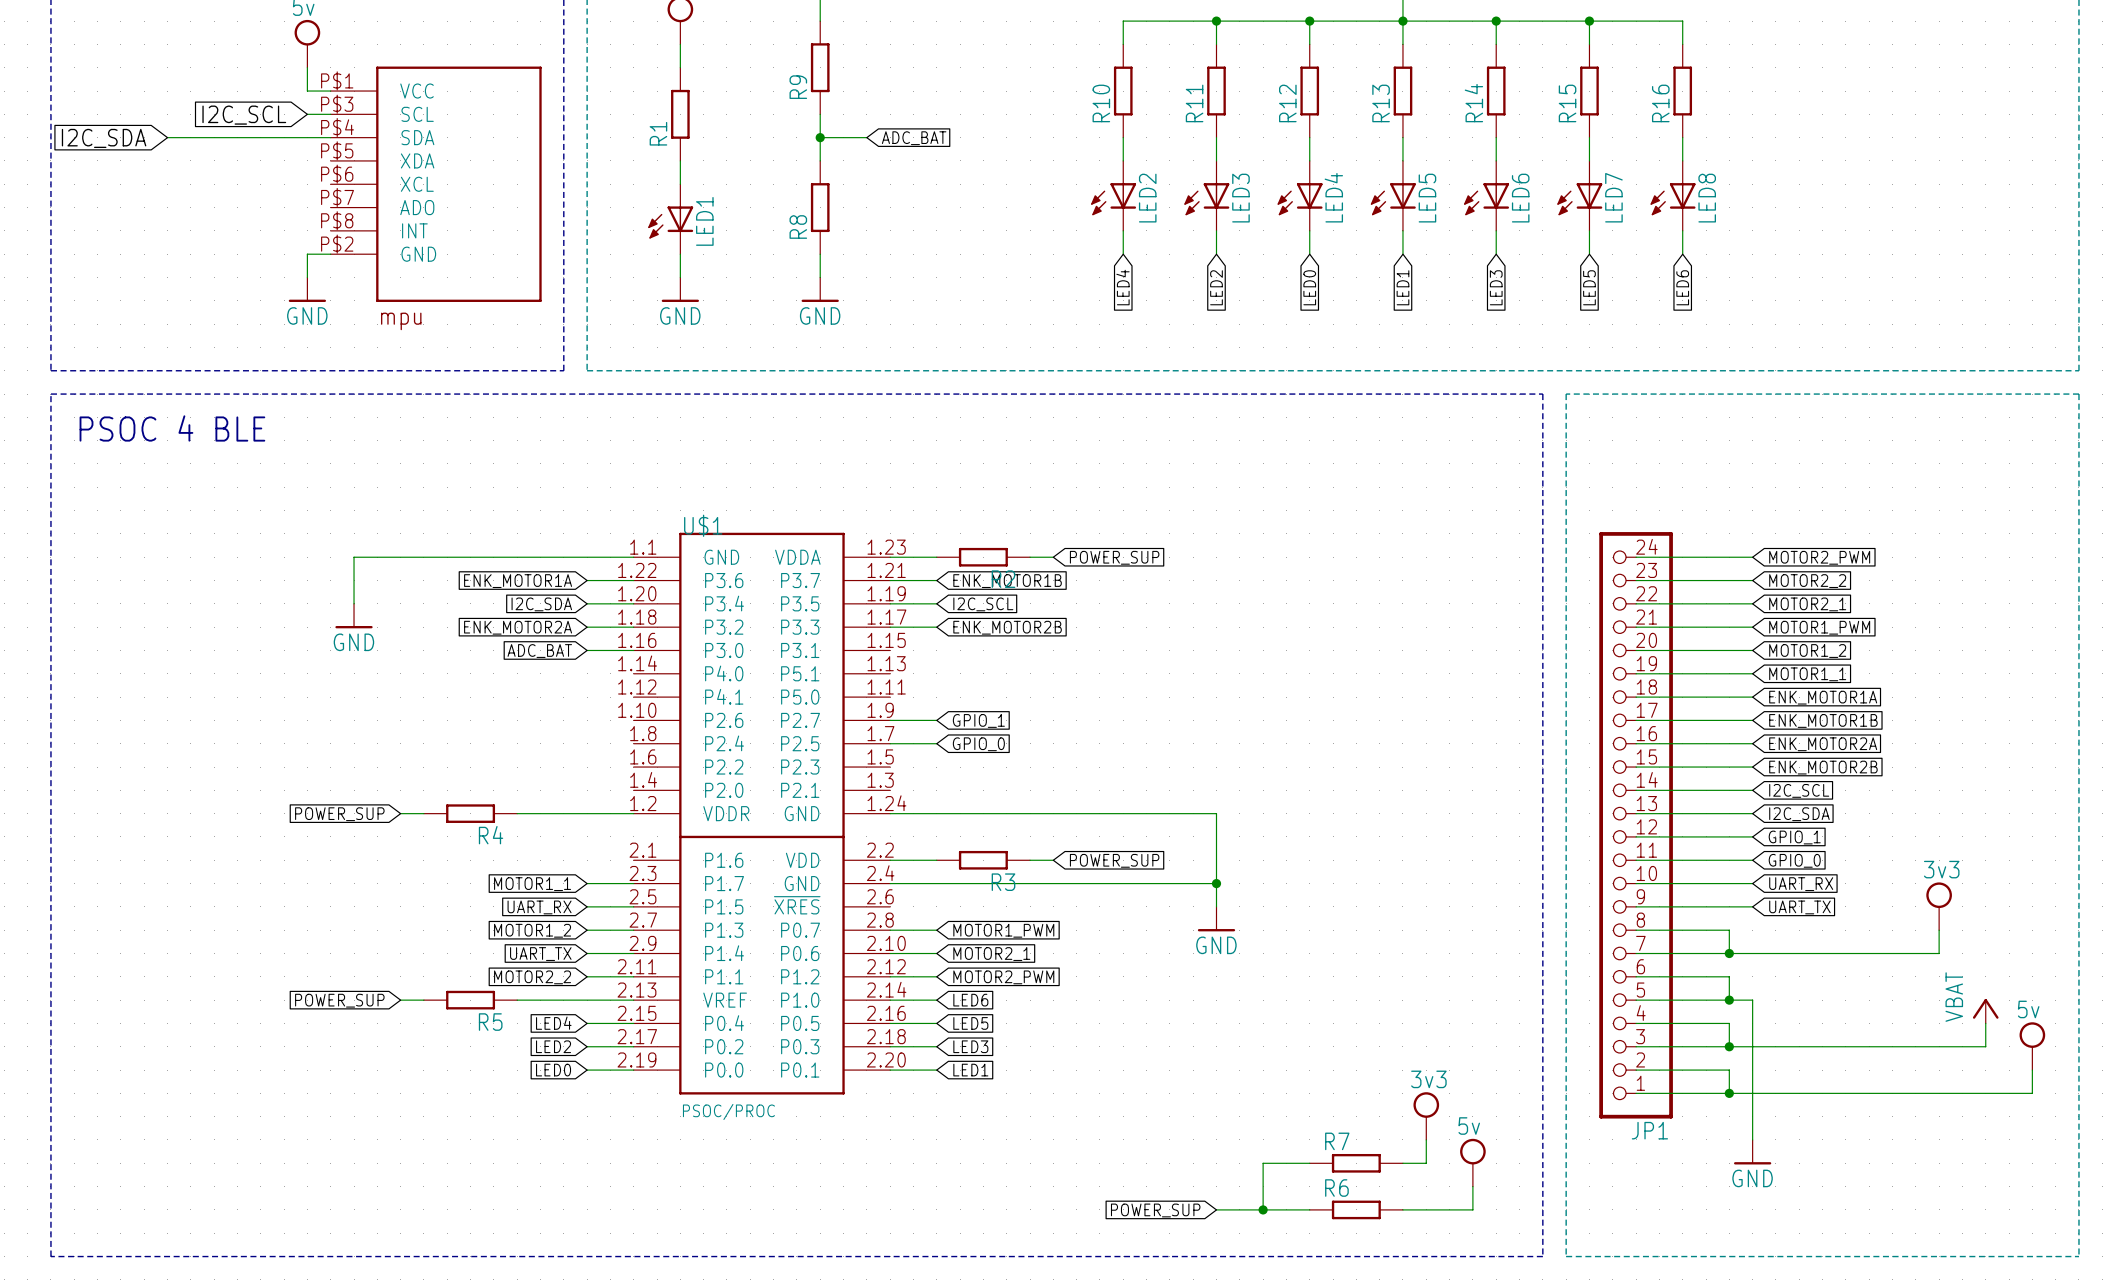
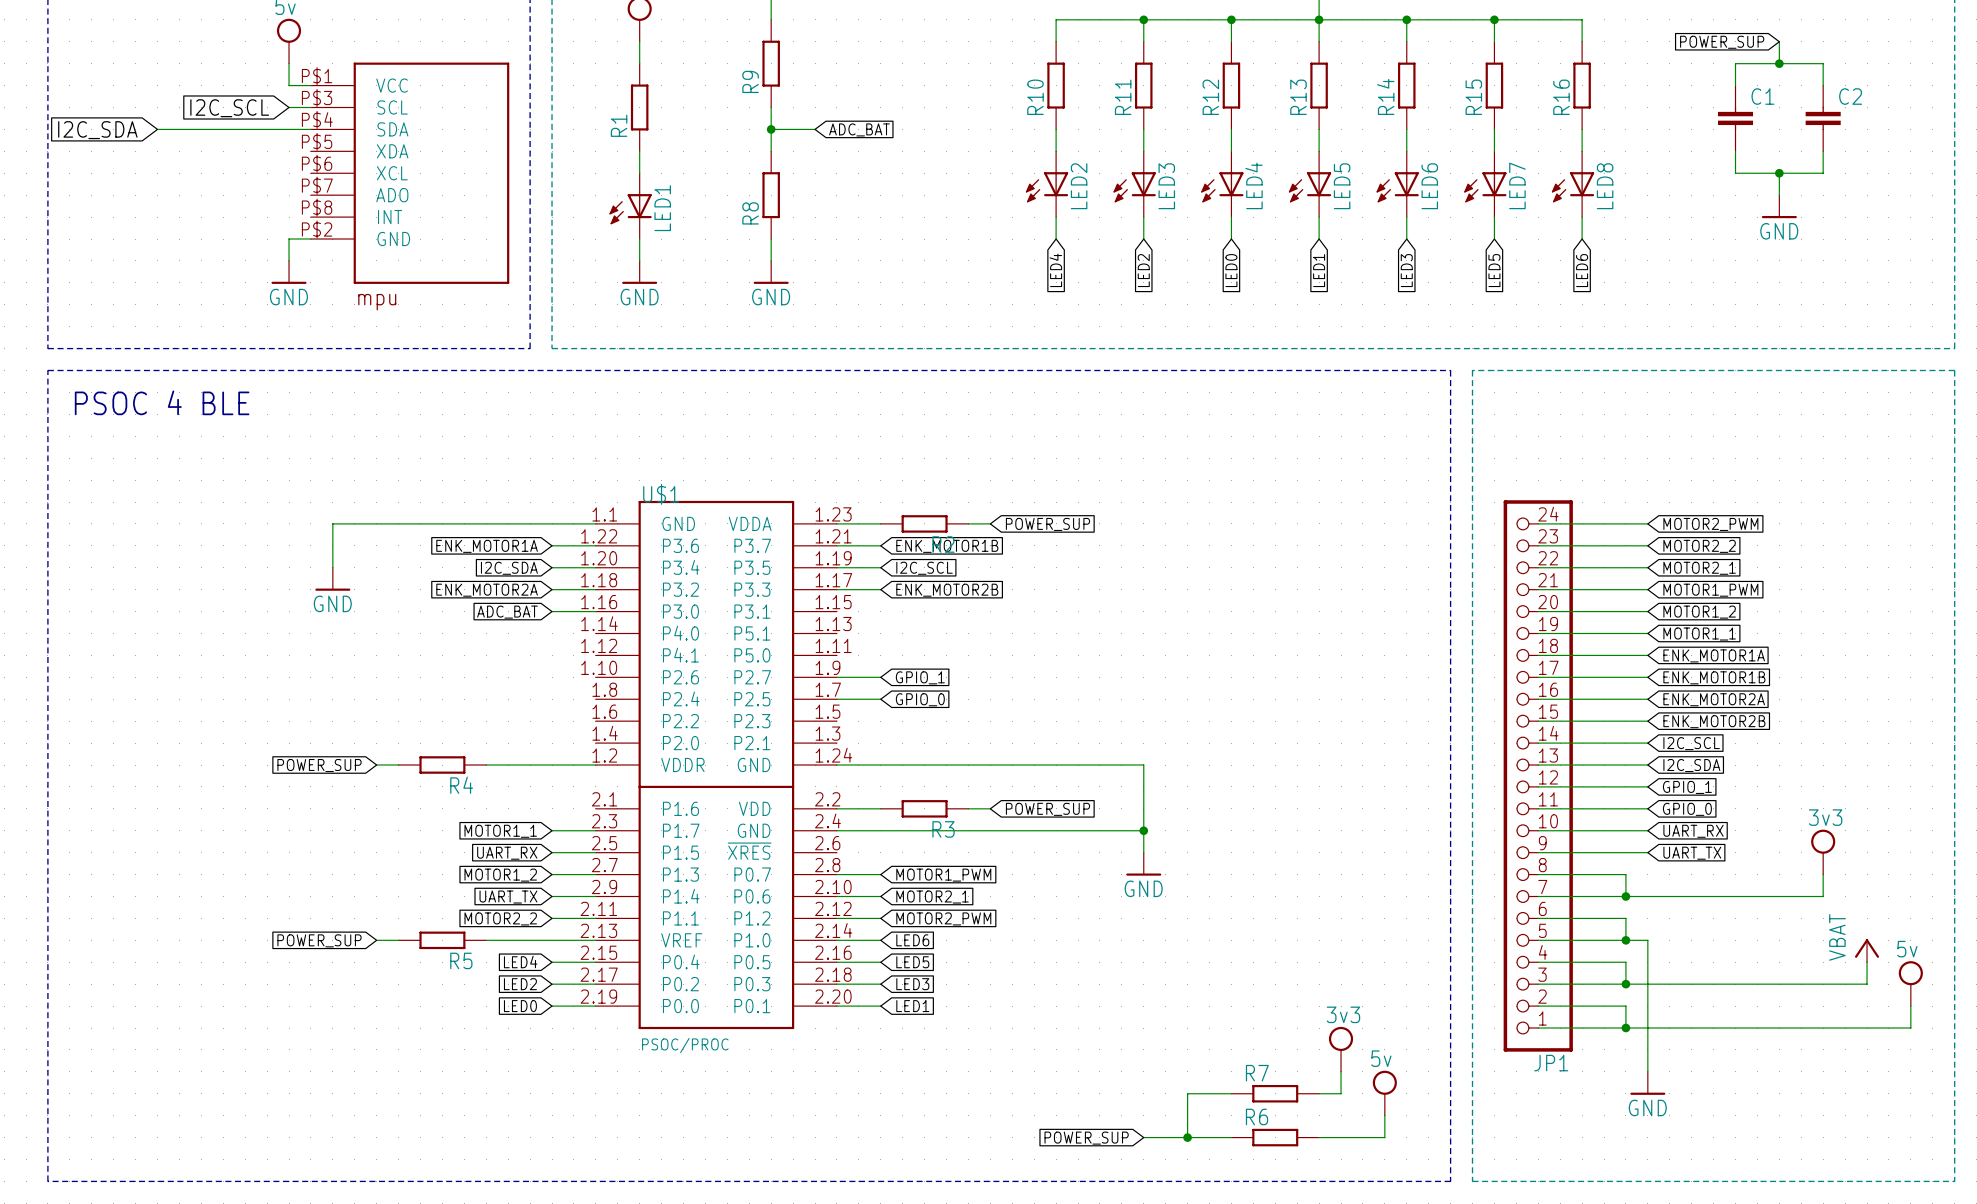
global label: none -> POWER_SUP (1722, 42)
wire: none -> (1779, 41) (1779, 63)
junction: none -> (1779, 63)
wire: none -> (1735, 85) (1735, 63) (1823, 63) (1823, 85)
C1: none -> (1735, 118)
C2: none -> (1823, 118)
wire: none -> (1735, 151) (1735, 173) (1823, 173) (1823, 151)
wire: none -> (1779, 173) (1779, 195)
junction: none -> (1779, 173)
power symbol: none -> GND (1779, 206)

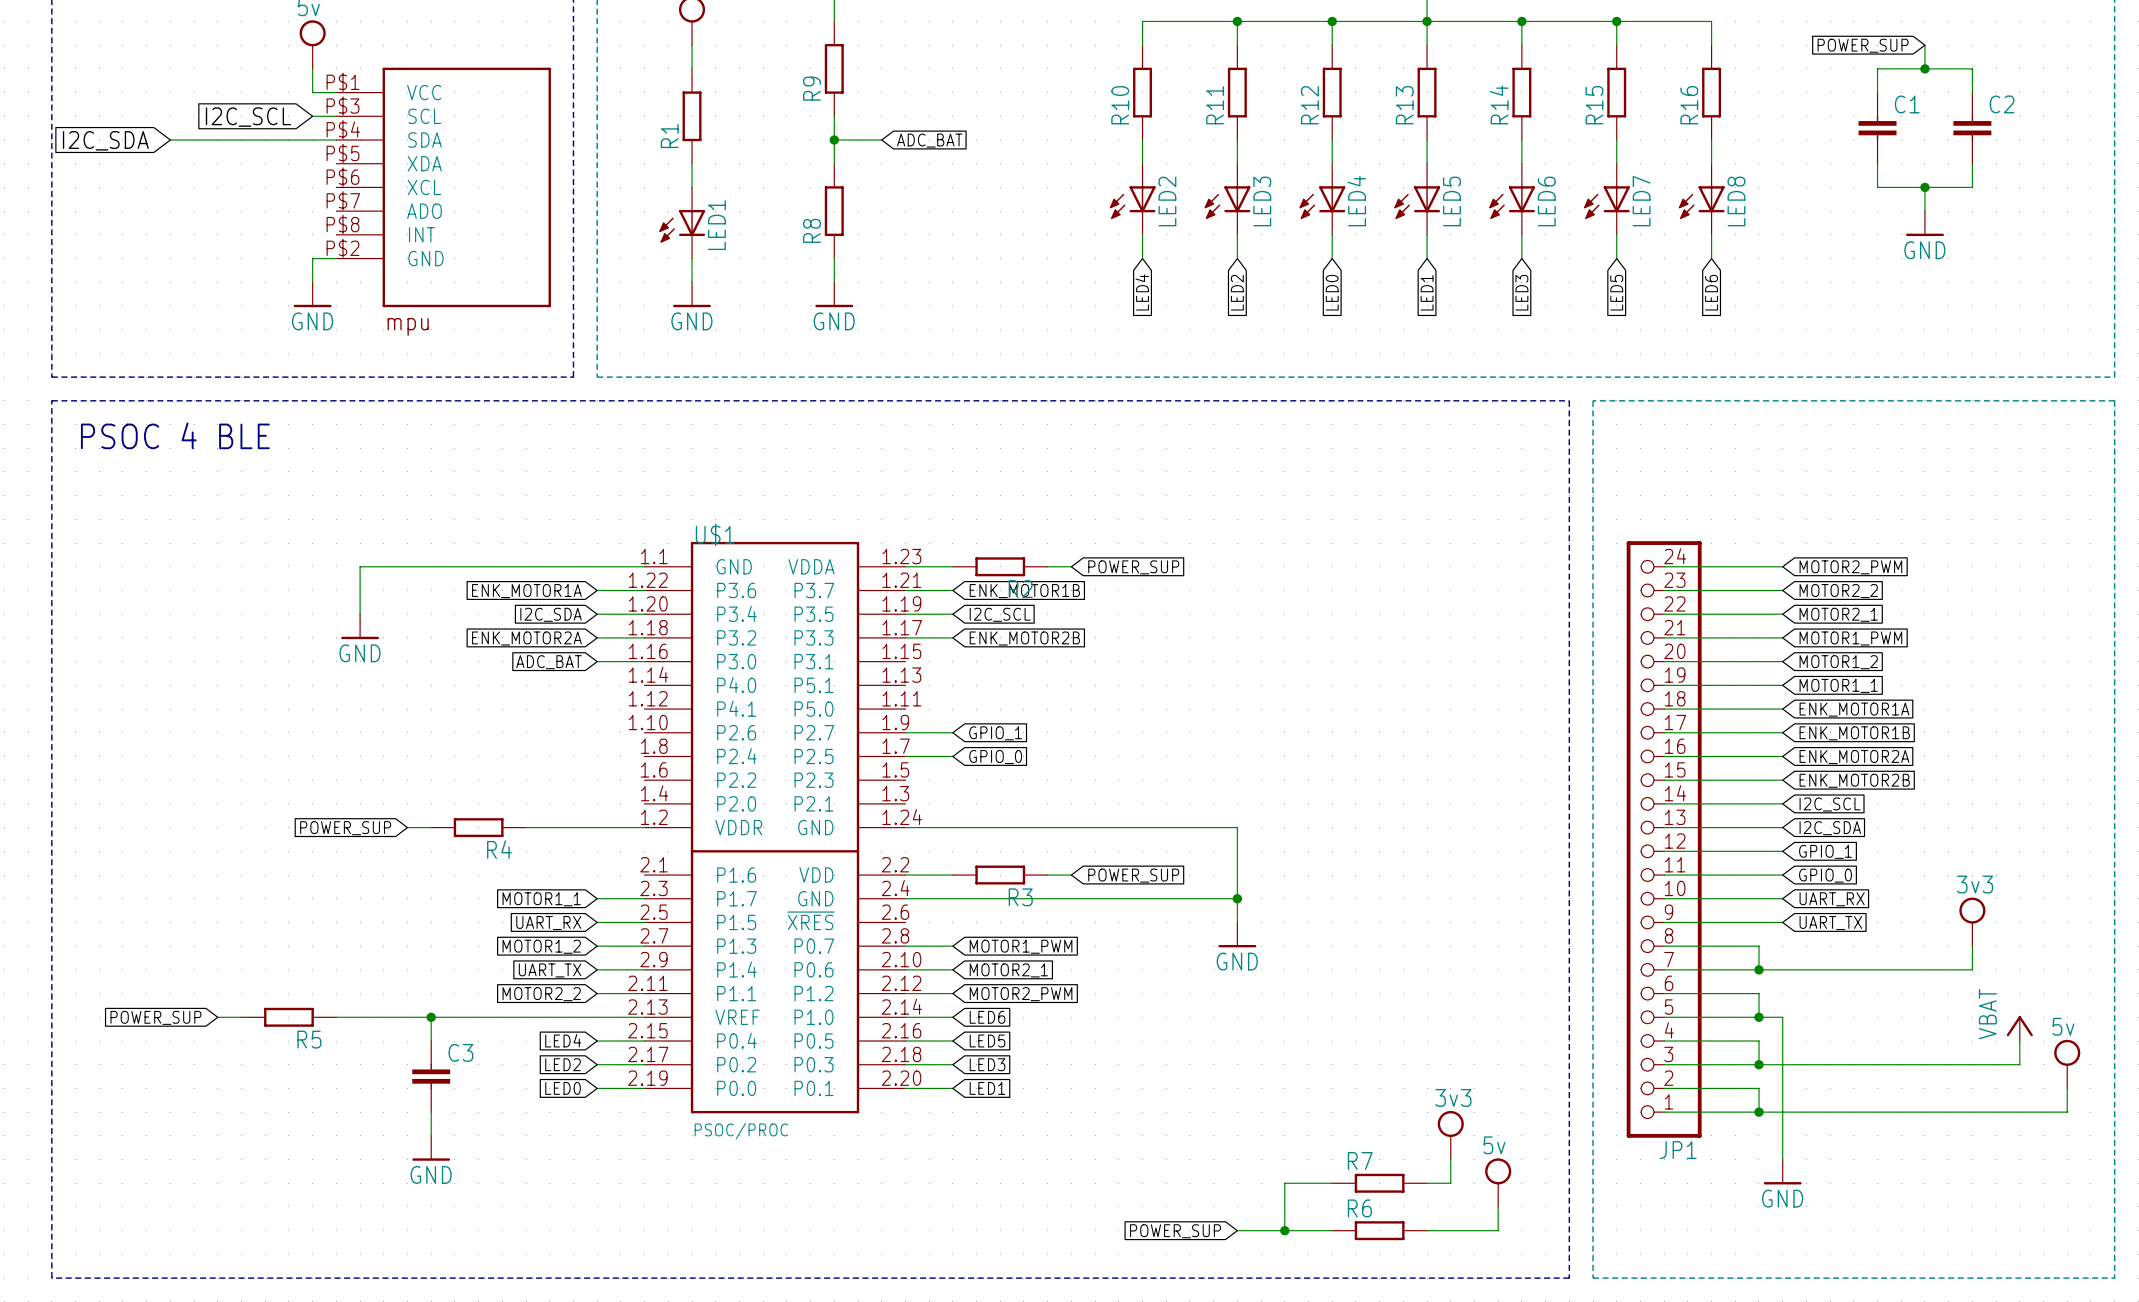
wire: none -> (217, 1017) (241, 1017)
wire: none -> (336, 1017) (407, 1017)
global label position: POWER_SUP (319, 940) -> POWER_SUP (155, 1017)
junction: none -> (431, 1017)
R5 position: (442, 940) -> (288, 1017)
wire: none -> (526, 1017) (431, 1017) (431, 1041)
C3: none -> (431, 1076)
wire: none -> (431, 1112) (431, 1135)
power symbol: none -> GND (431, 1148)

